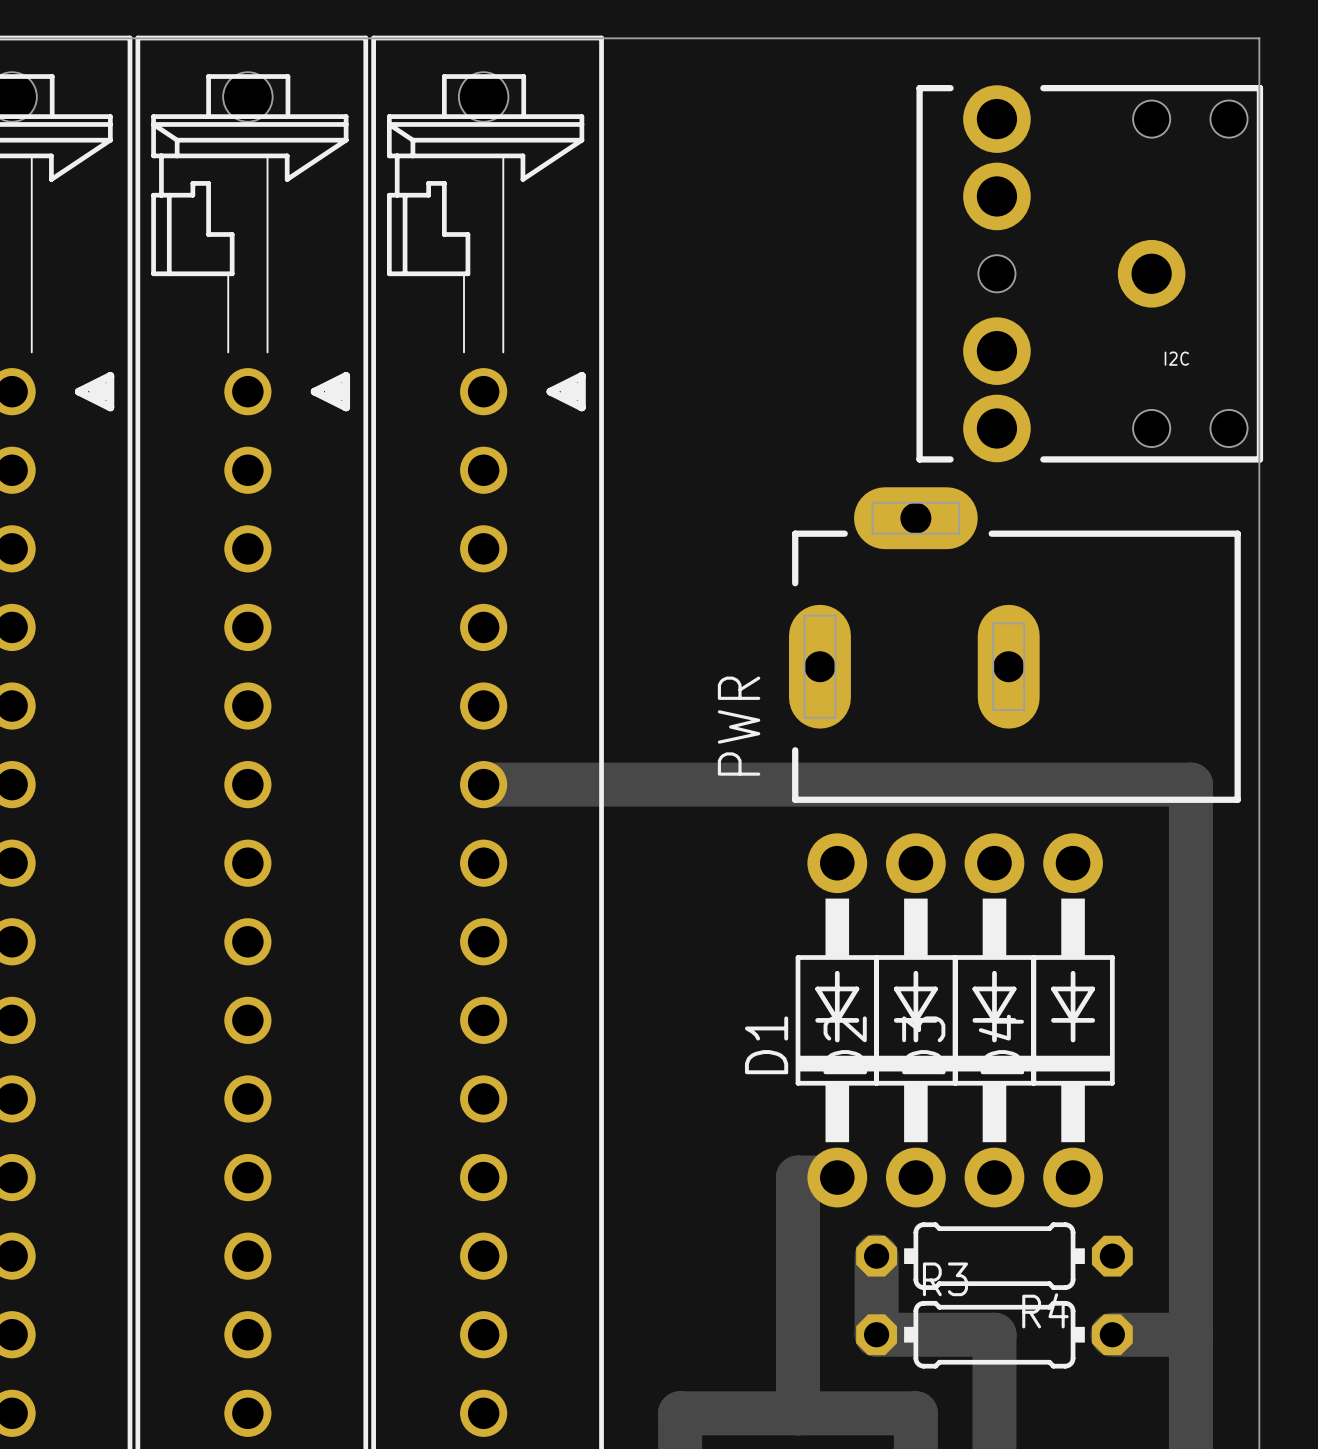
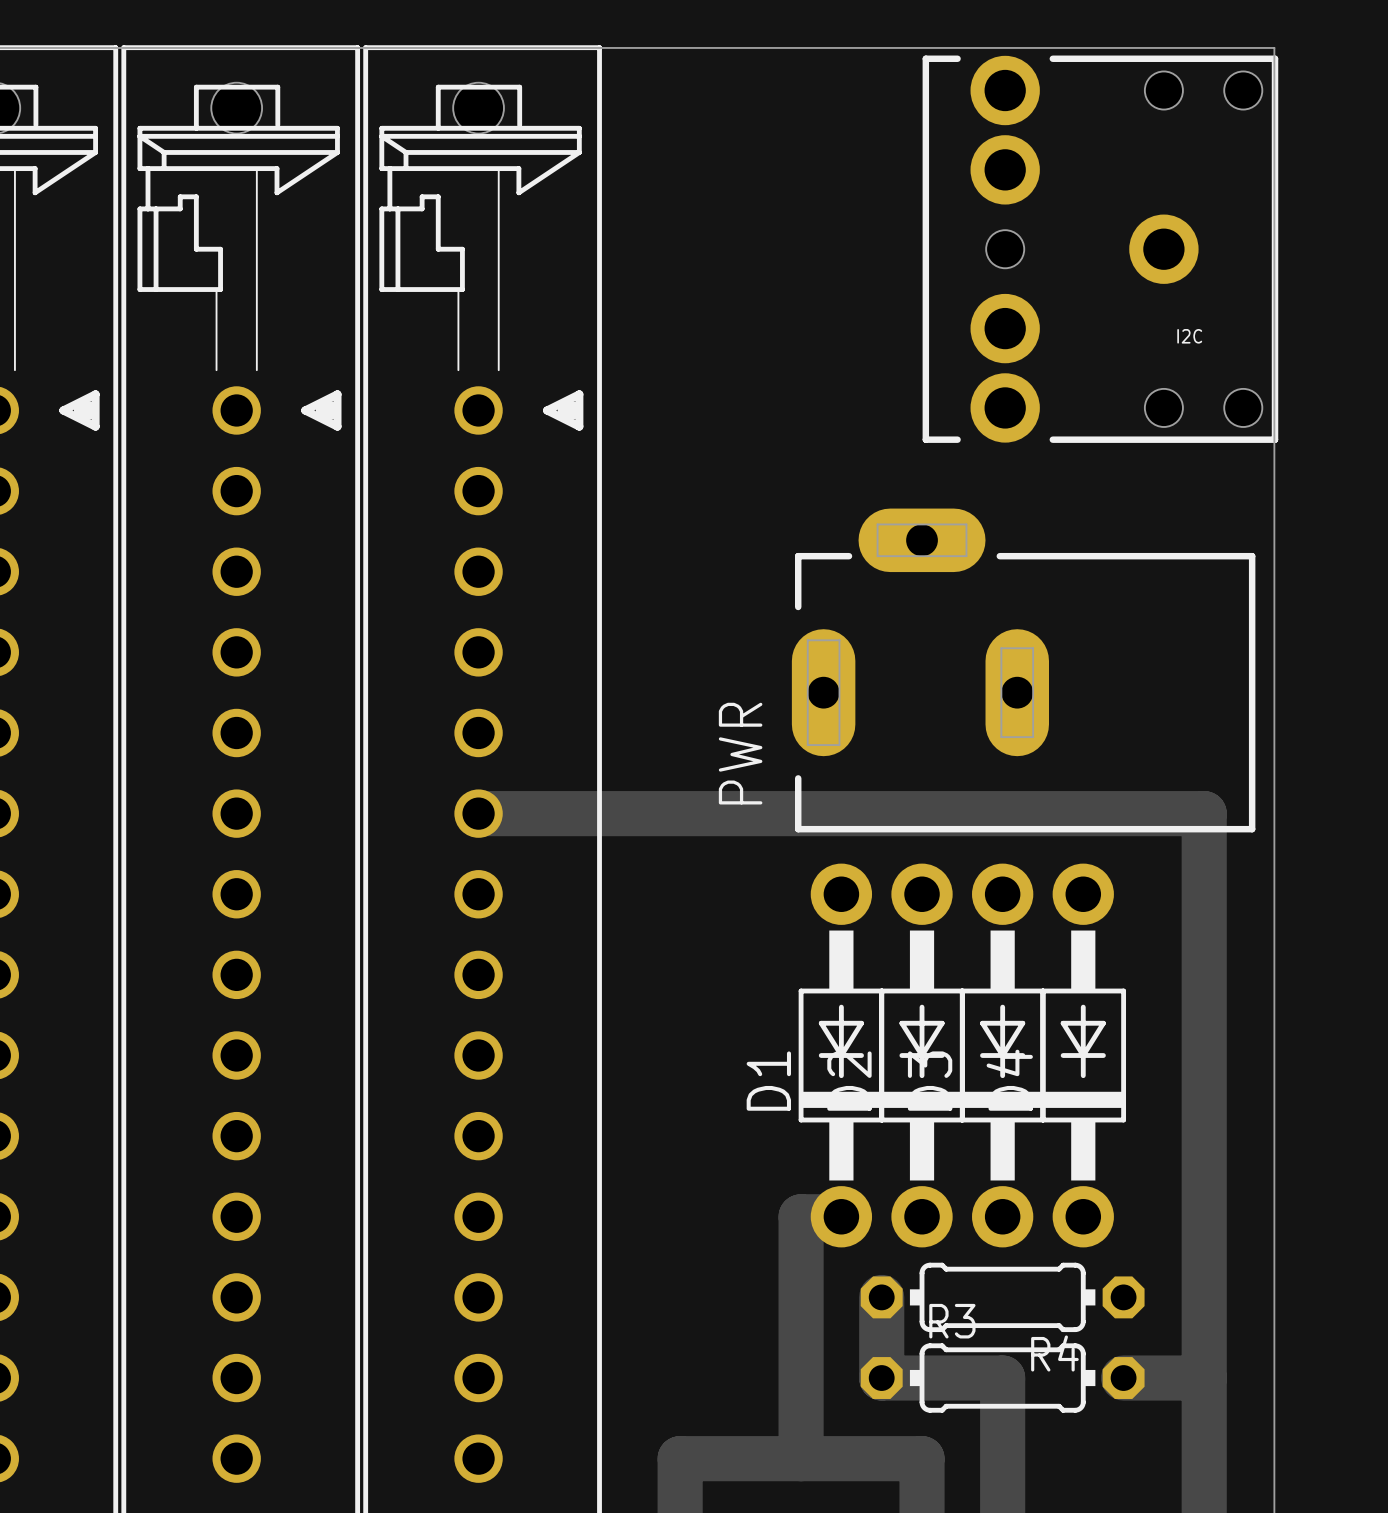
I2C position: (1089, 273) -> (1100, 249)

